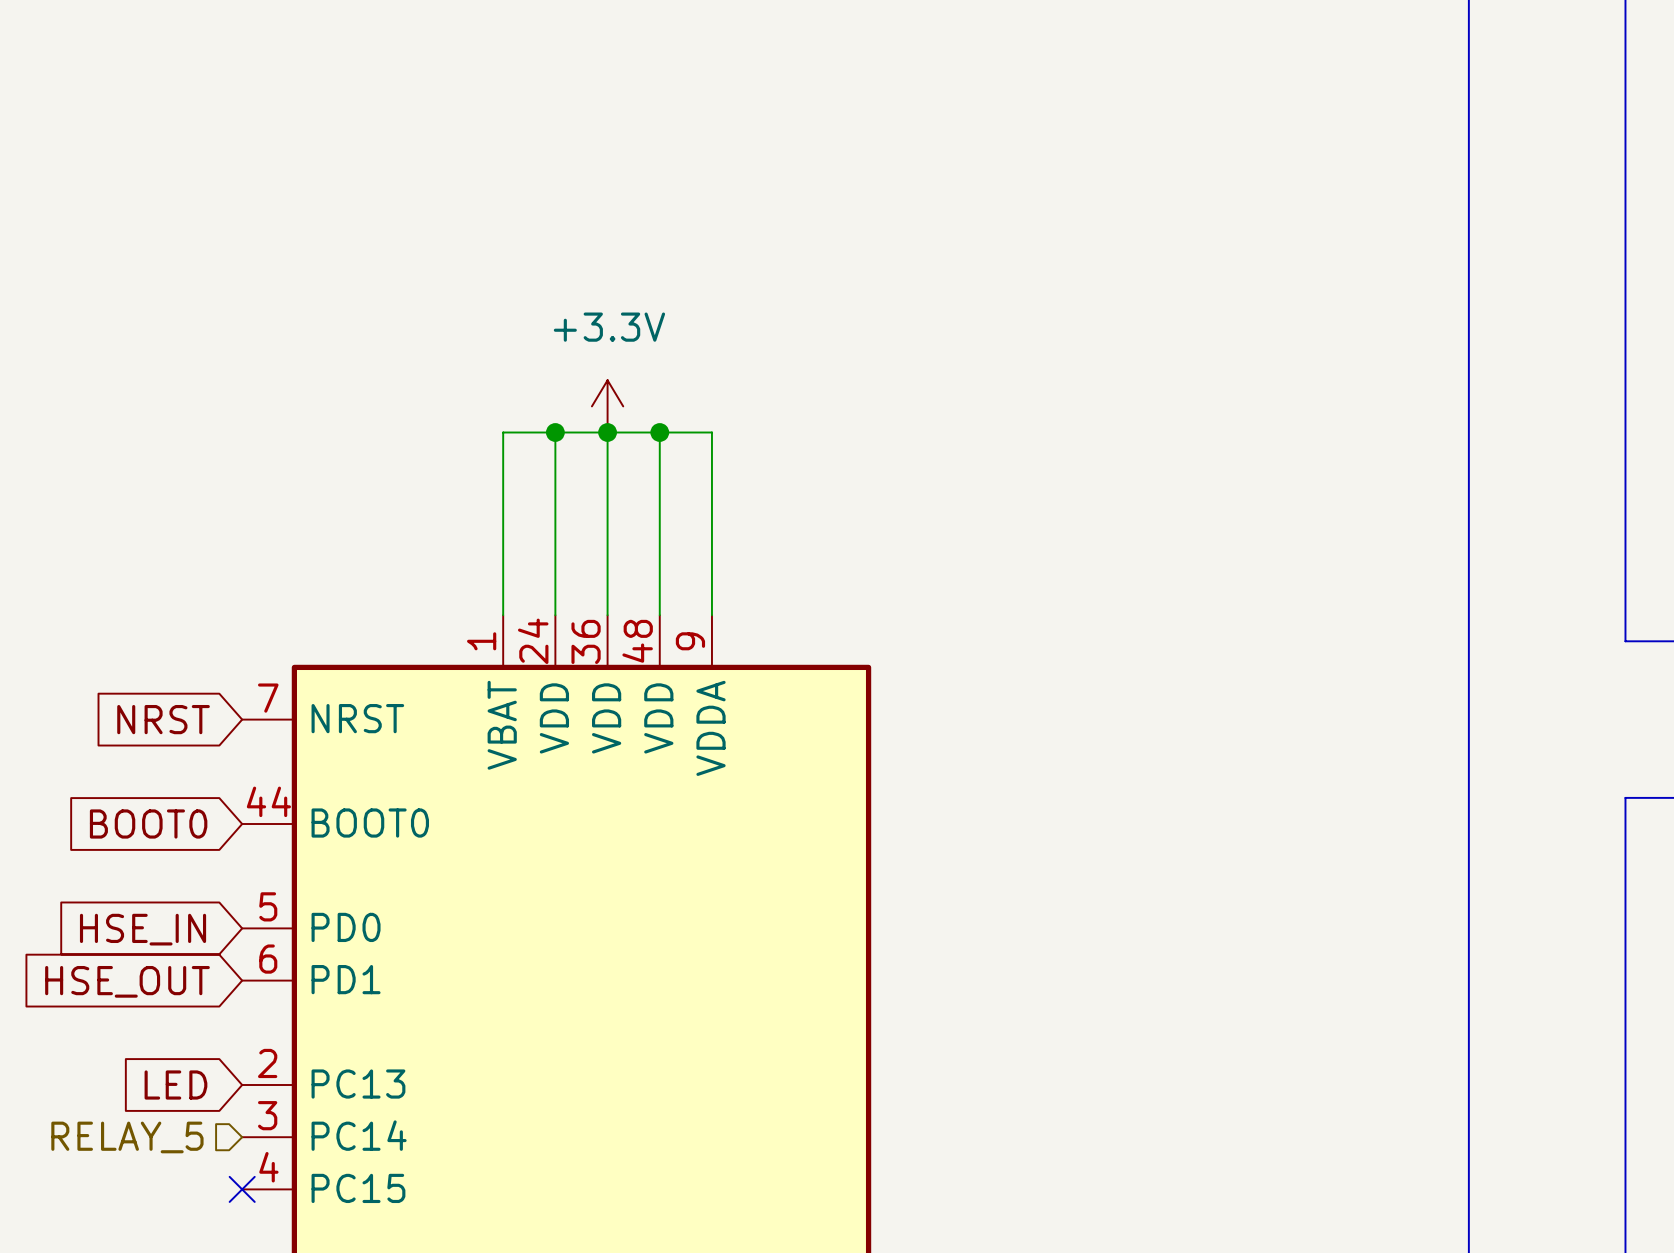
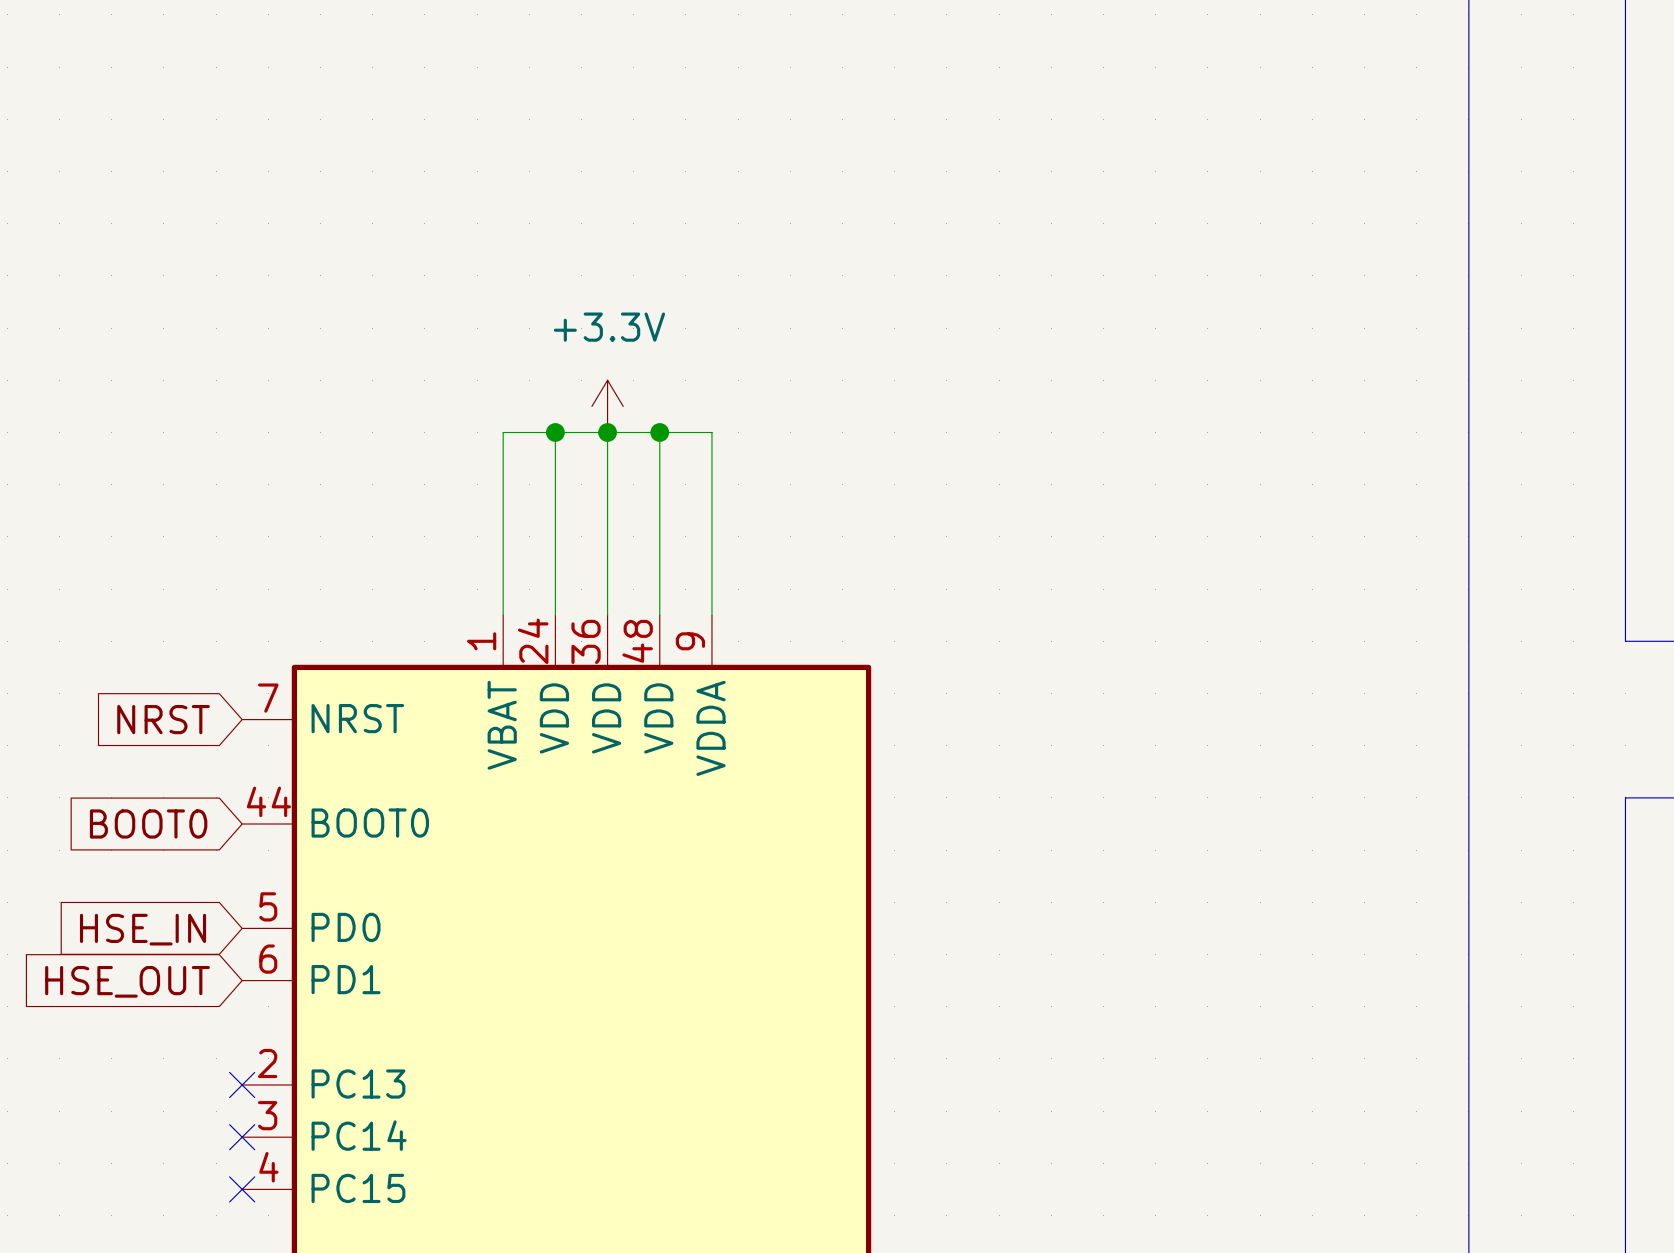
global label: LED (175, 1084) -> none
no-connect mark: none -> (242, 1084)
hierarchical label: RELAY_5 (127, 1137) -> none
no-connect mark: none -> (242, 1137)

